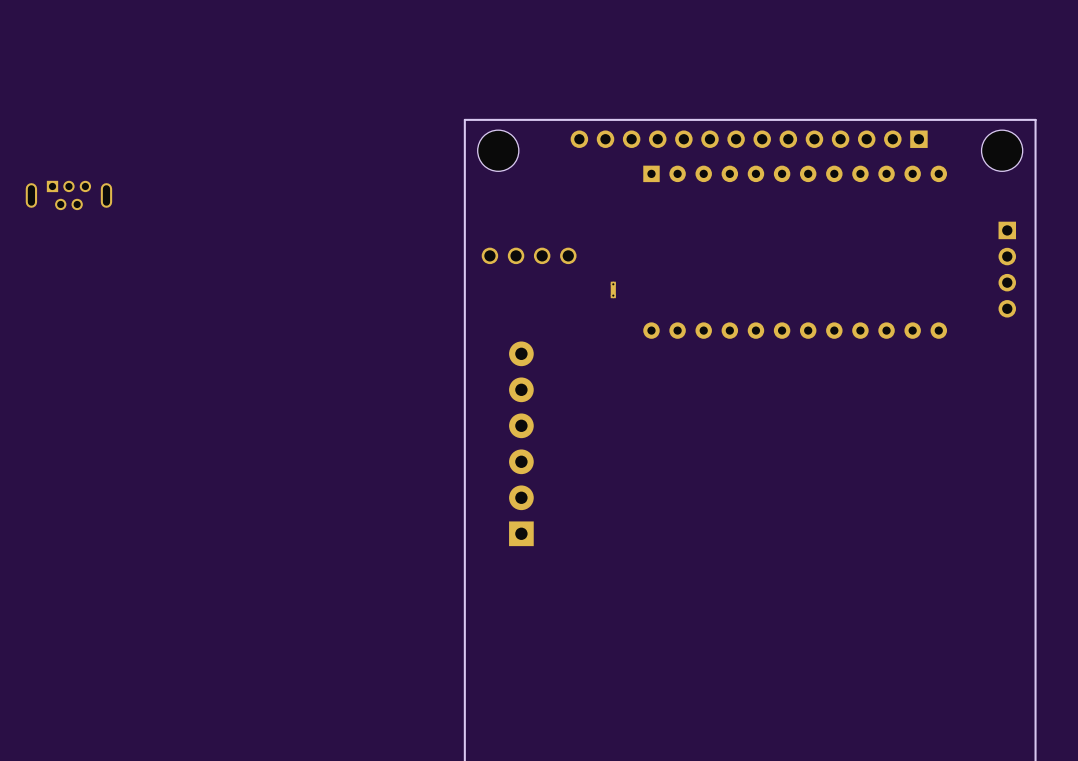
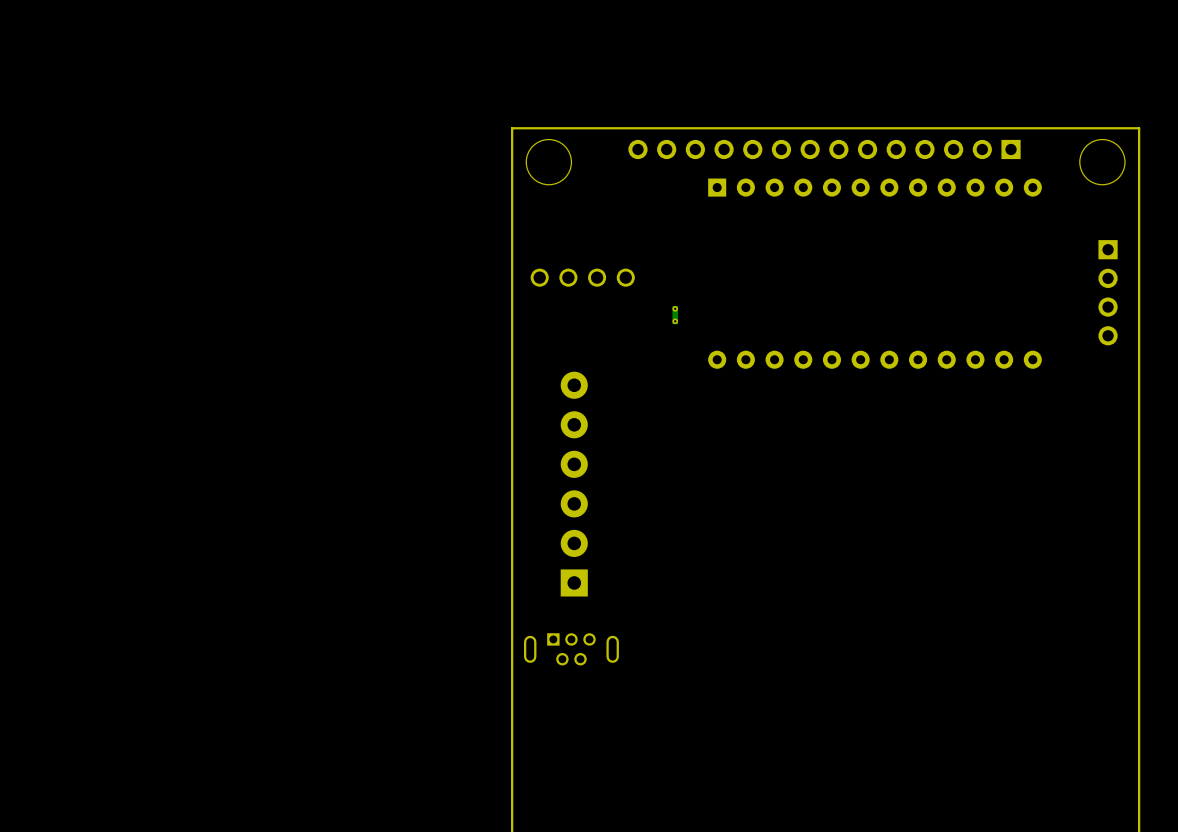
part: (68, 195) -> none
part: none -> (571, 649)

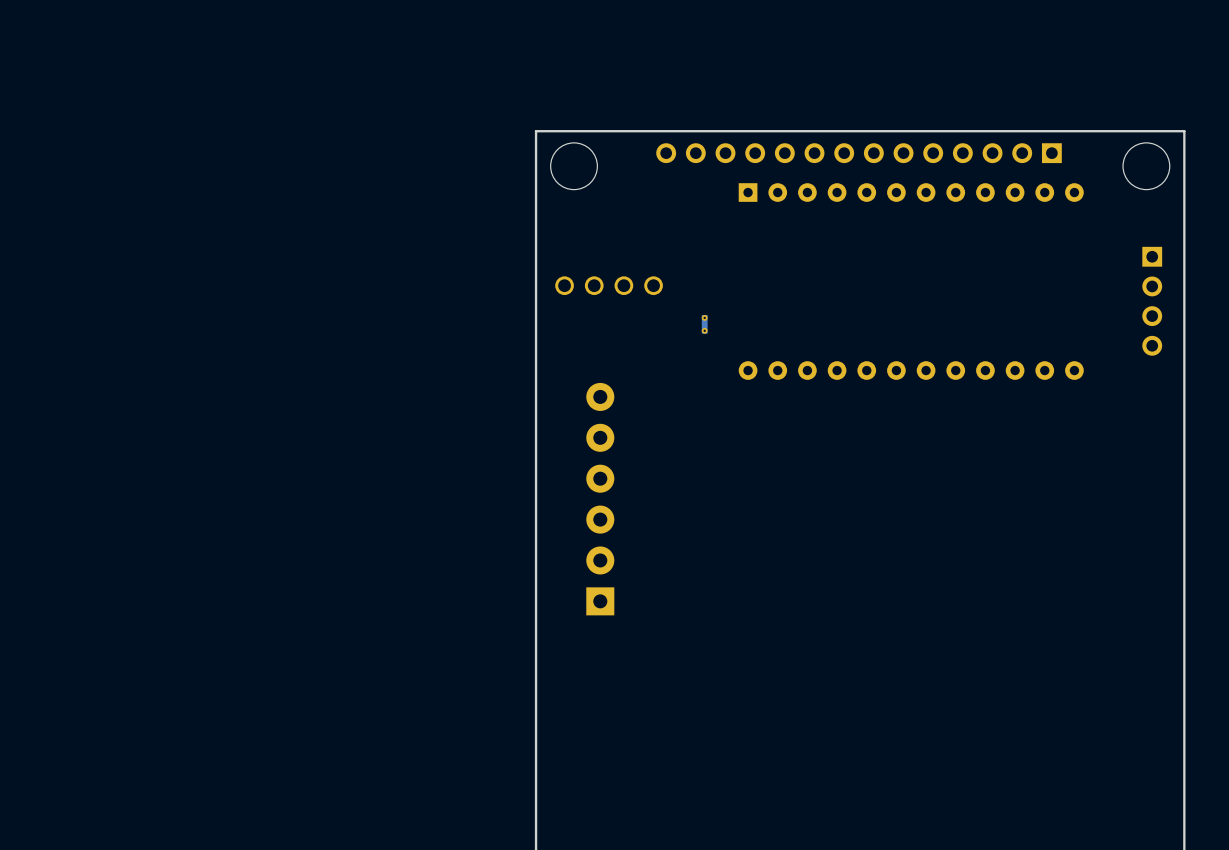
part: (571, 649) -> none

